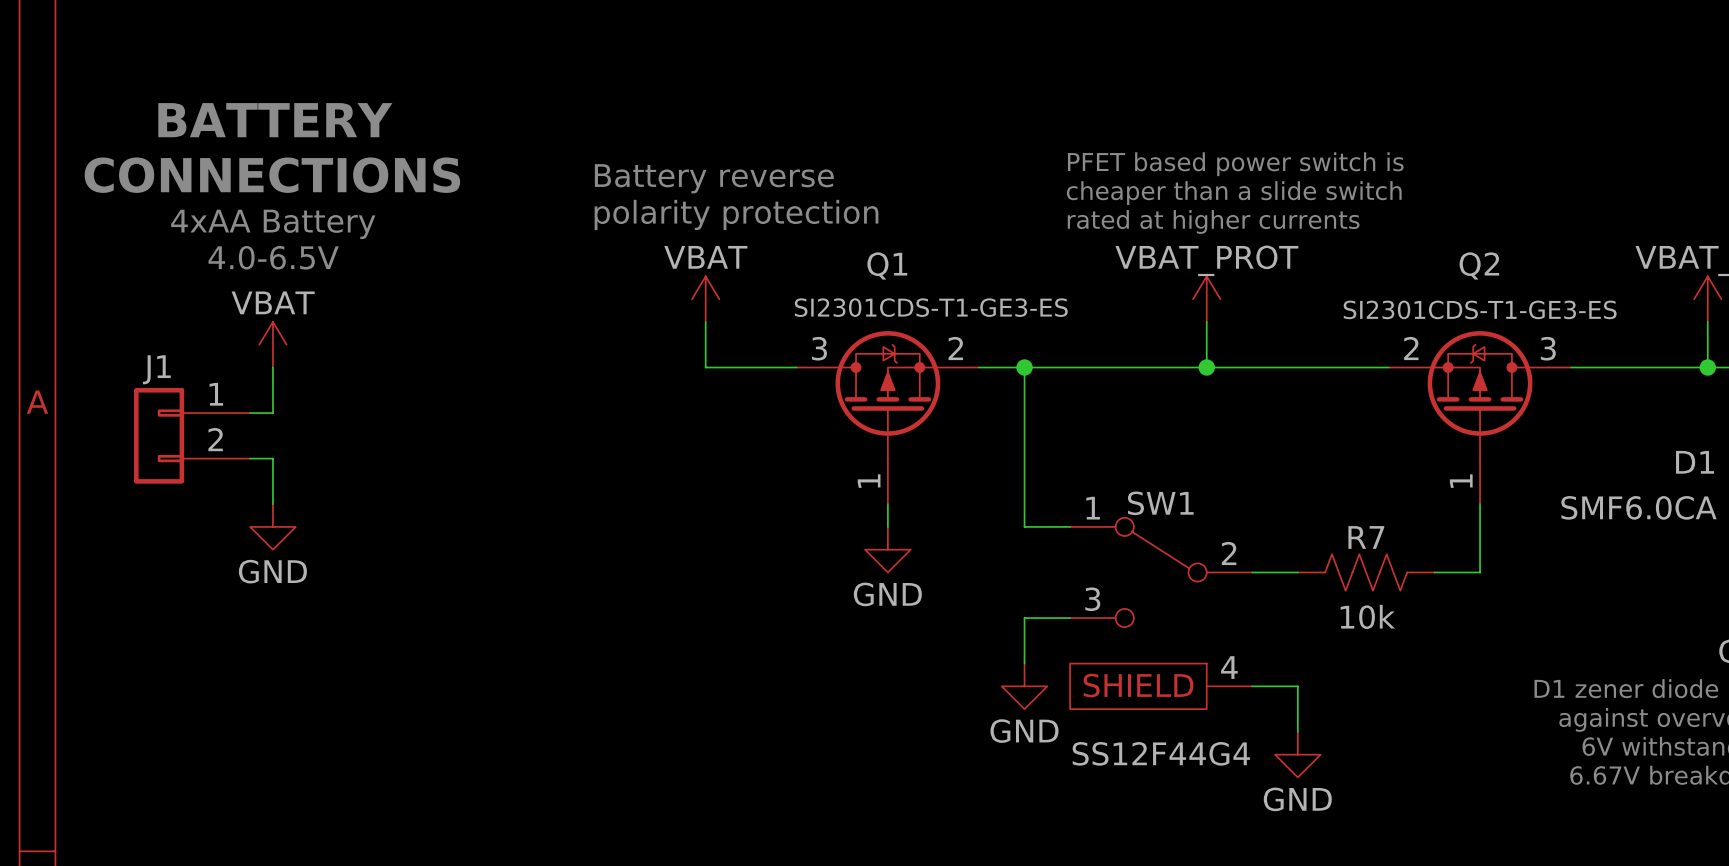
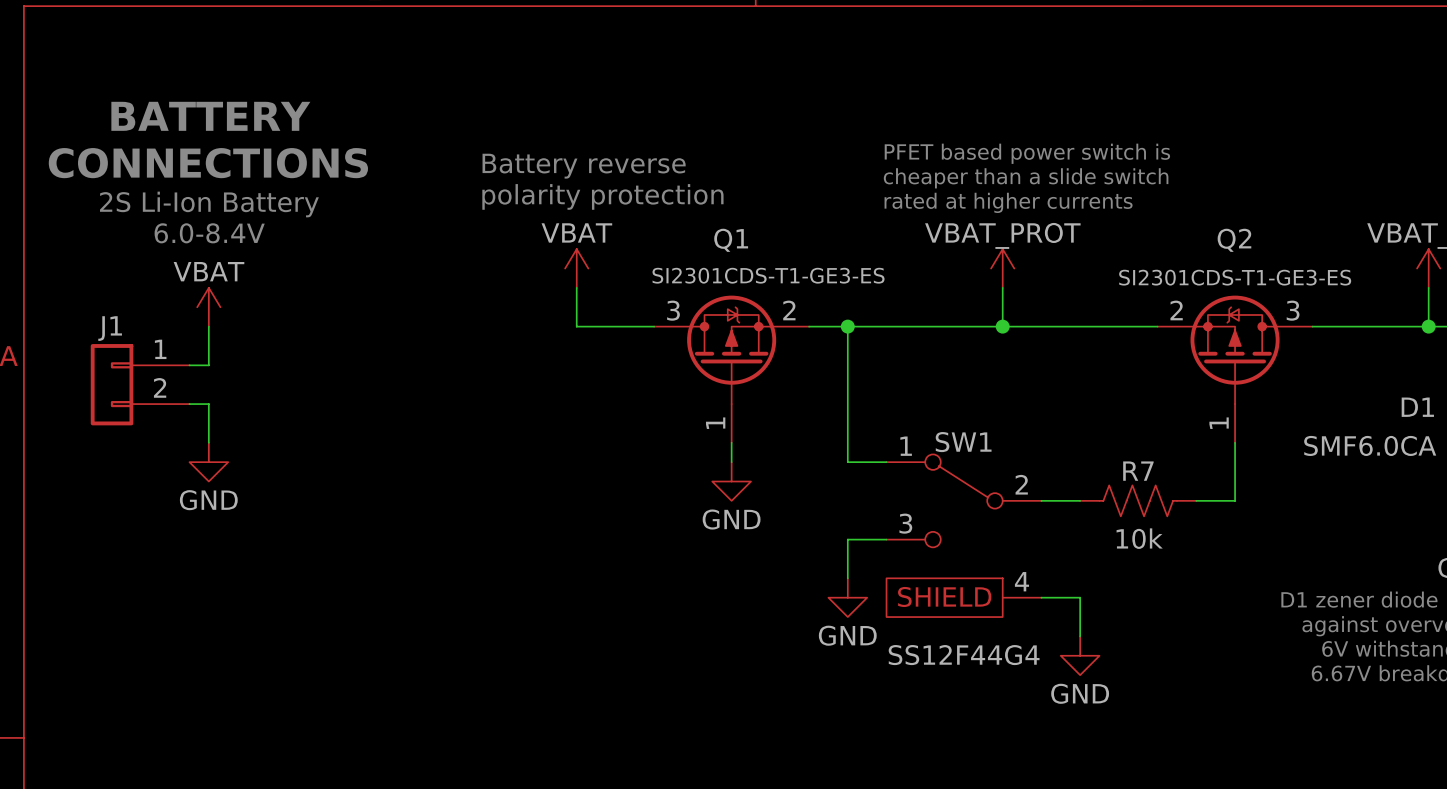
text: 4xAA Battery (273, 224) -> 2S Li-Ion Battery (209, 204)
text: 4.0-6.5V (273, 257) -> 6.0-8.4V (209, 233)

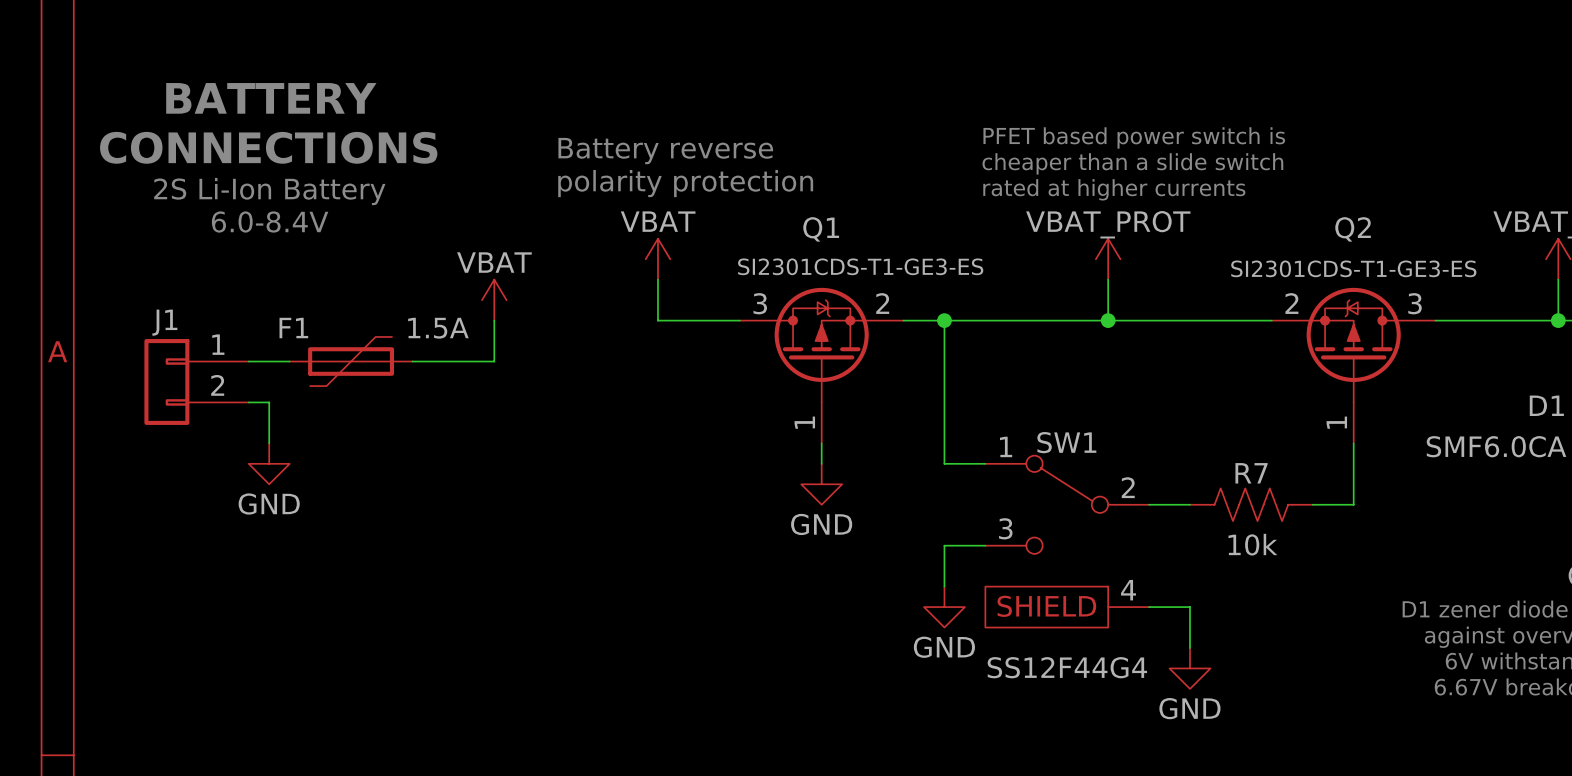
power symbol position: VBAT (208, 307) -> VBAT (494, 300)
wire: (208, 326) (208, 365) -> (289, 361) (269, 361)
wire: none -> (494, 320) (494, 361) (412, 361)
F1: none -> 1.5A (351, 361)

